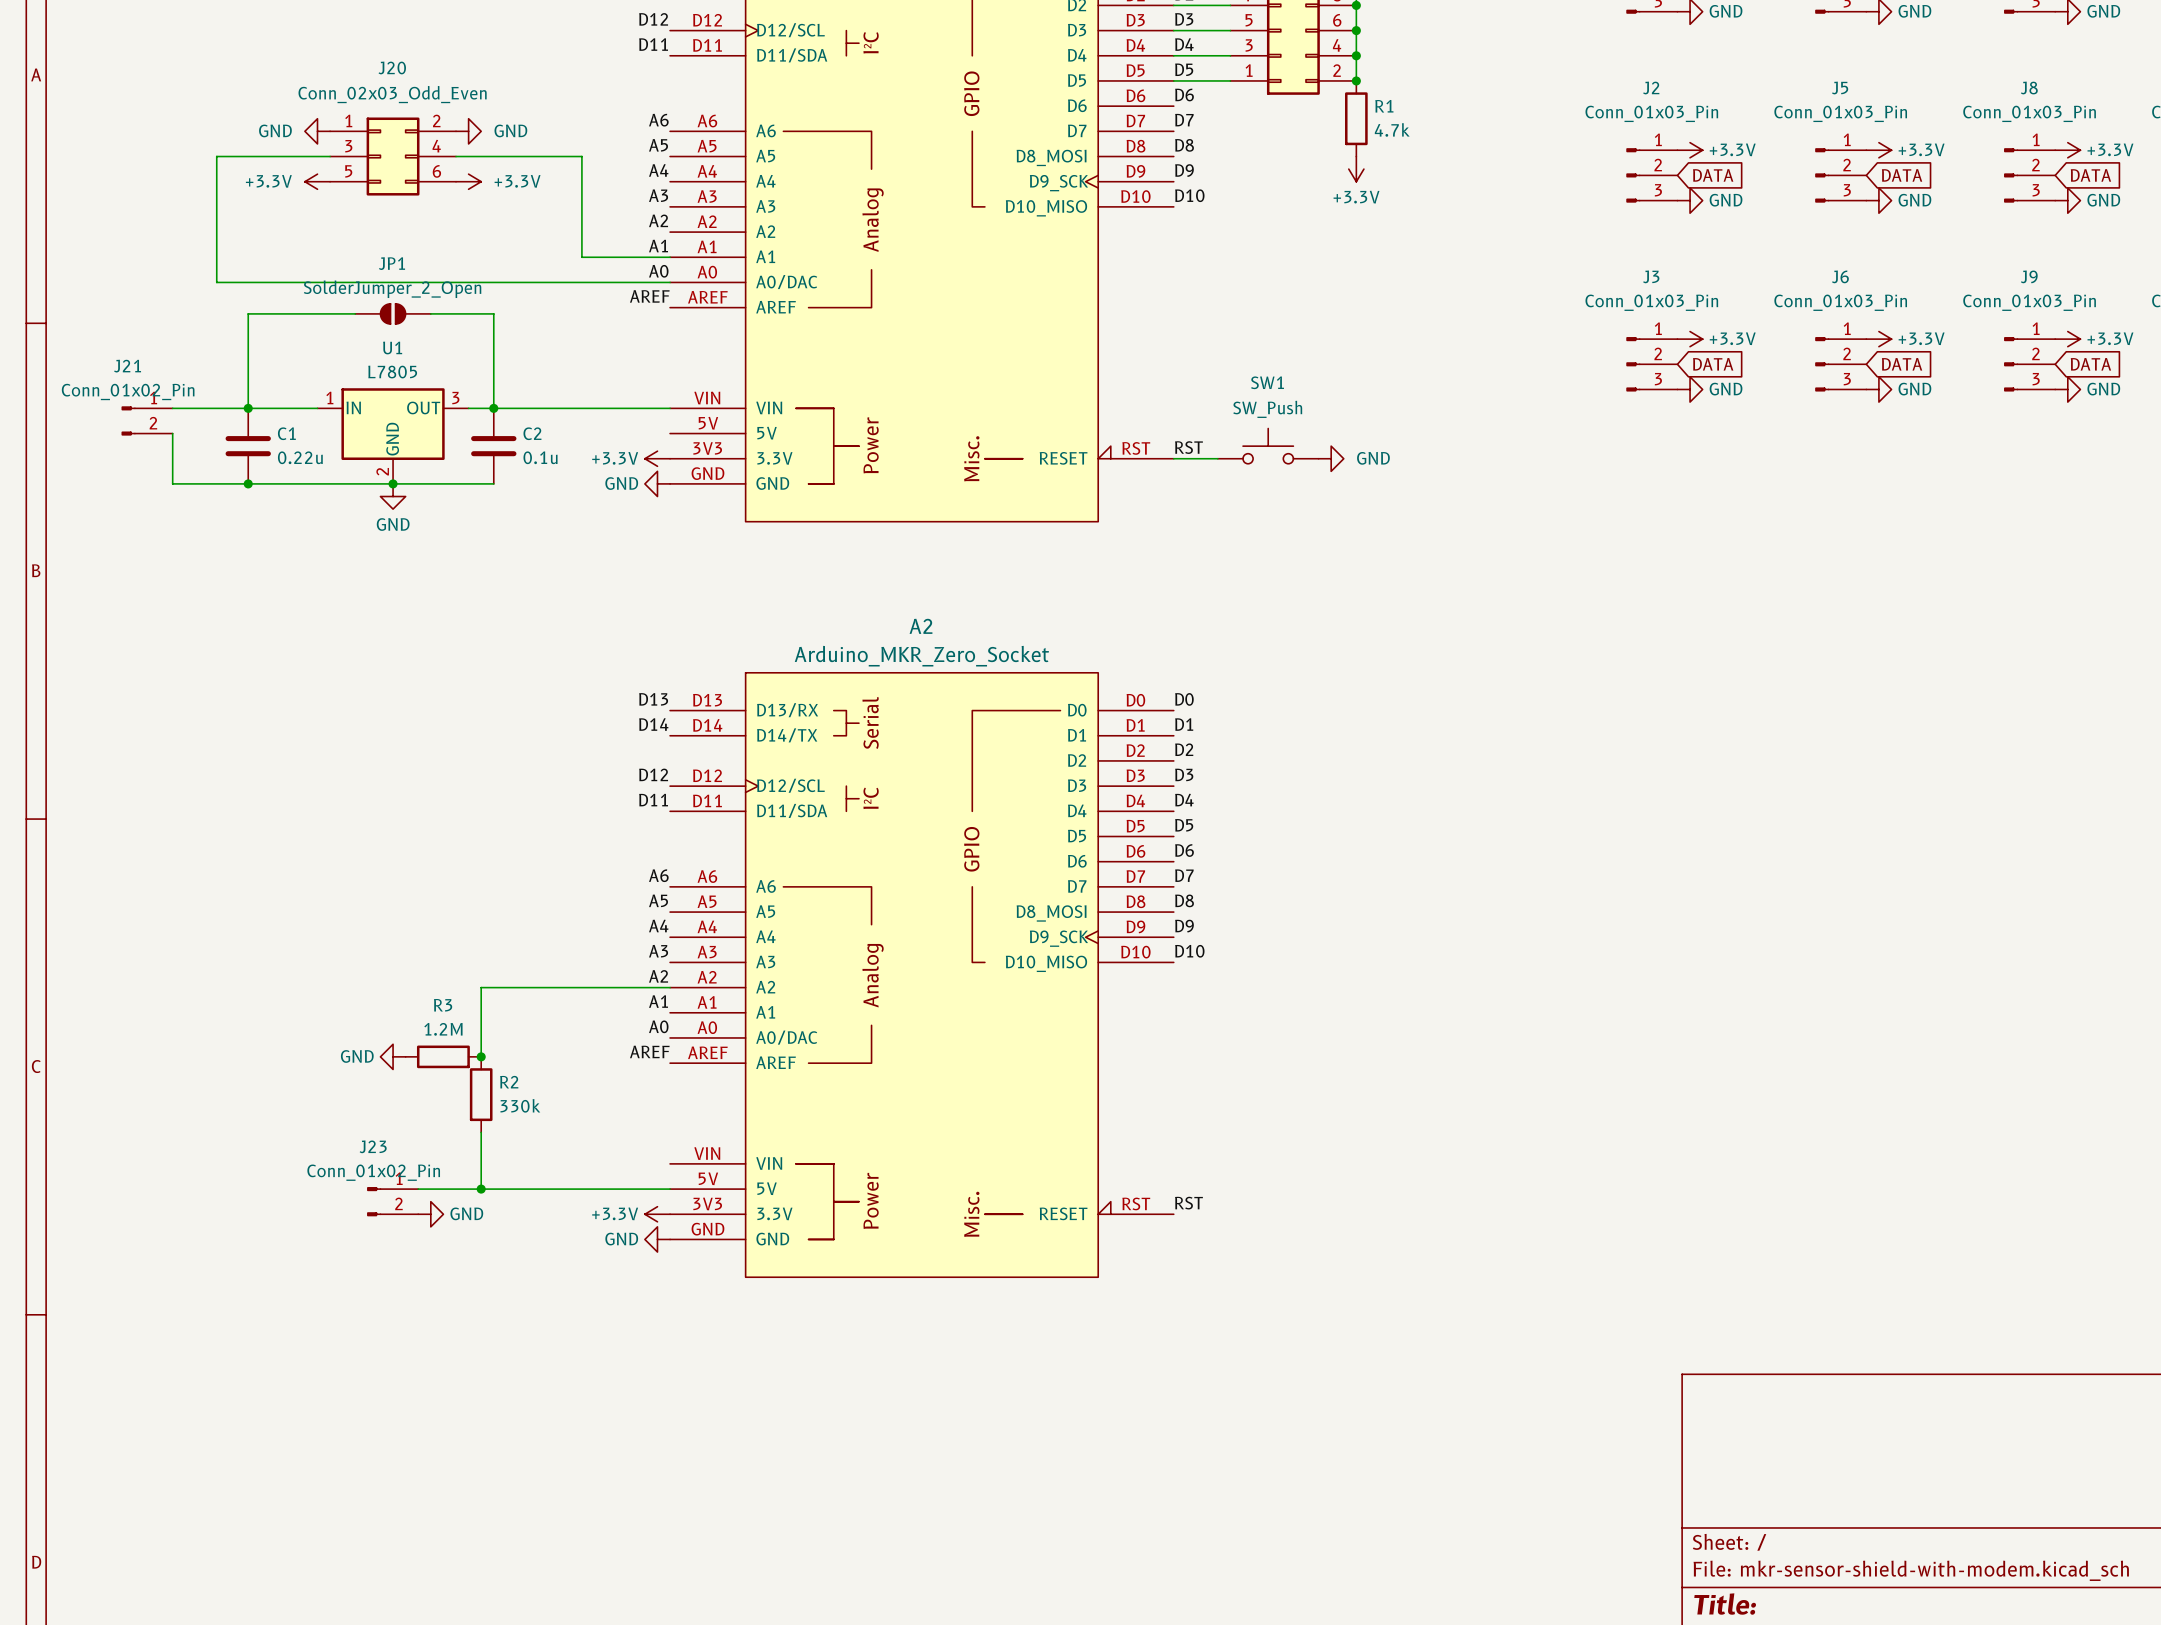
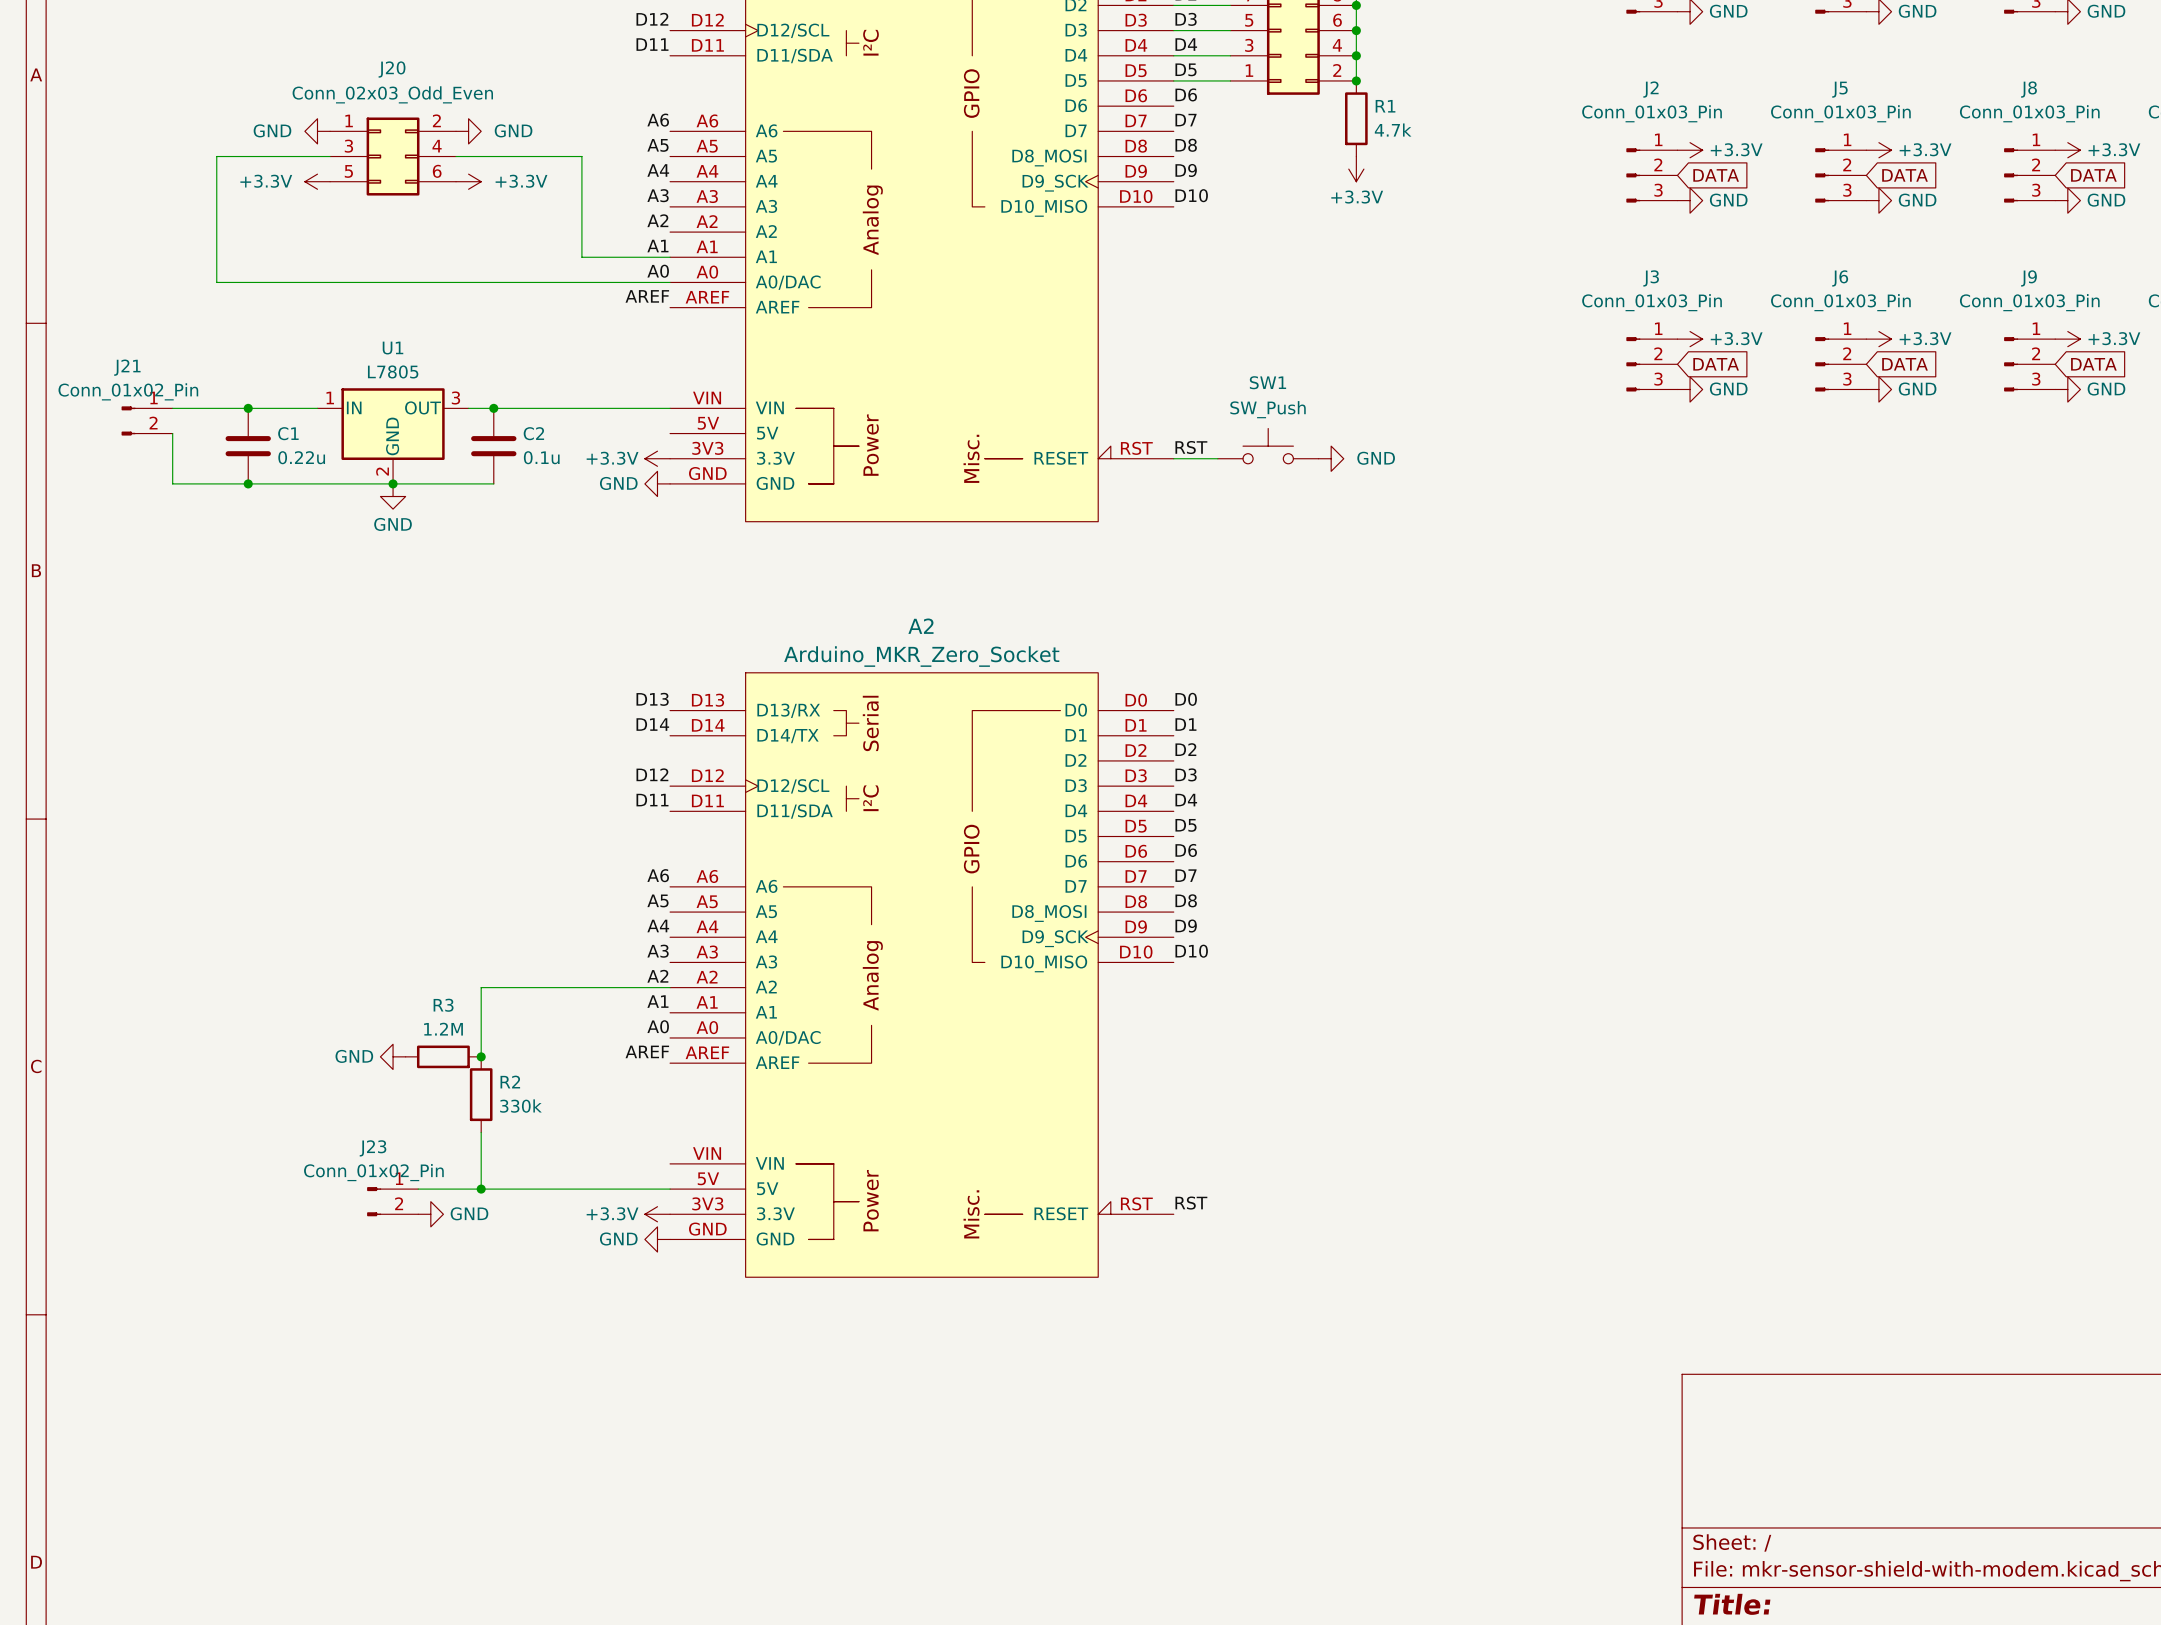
wire: (355, 313) (248, 313) (248, 408) -> none
JP1: SolderJumper_2_Open (393, 313) -> none
wire: (430, 313) (493, 313) (493, 408) -> none

